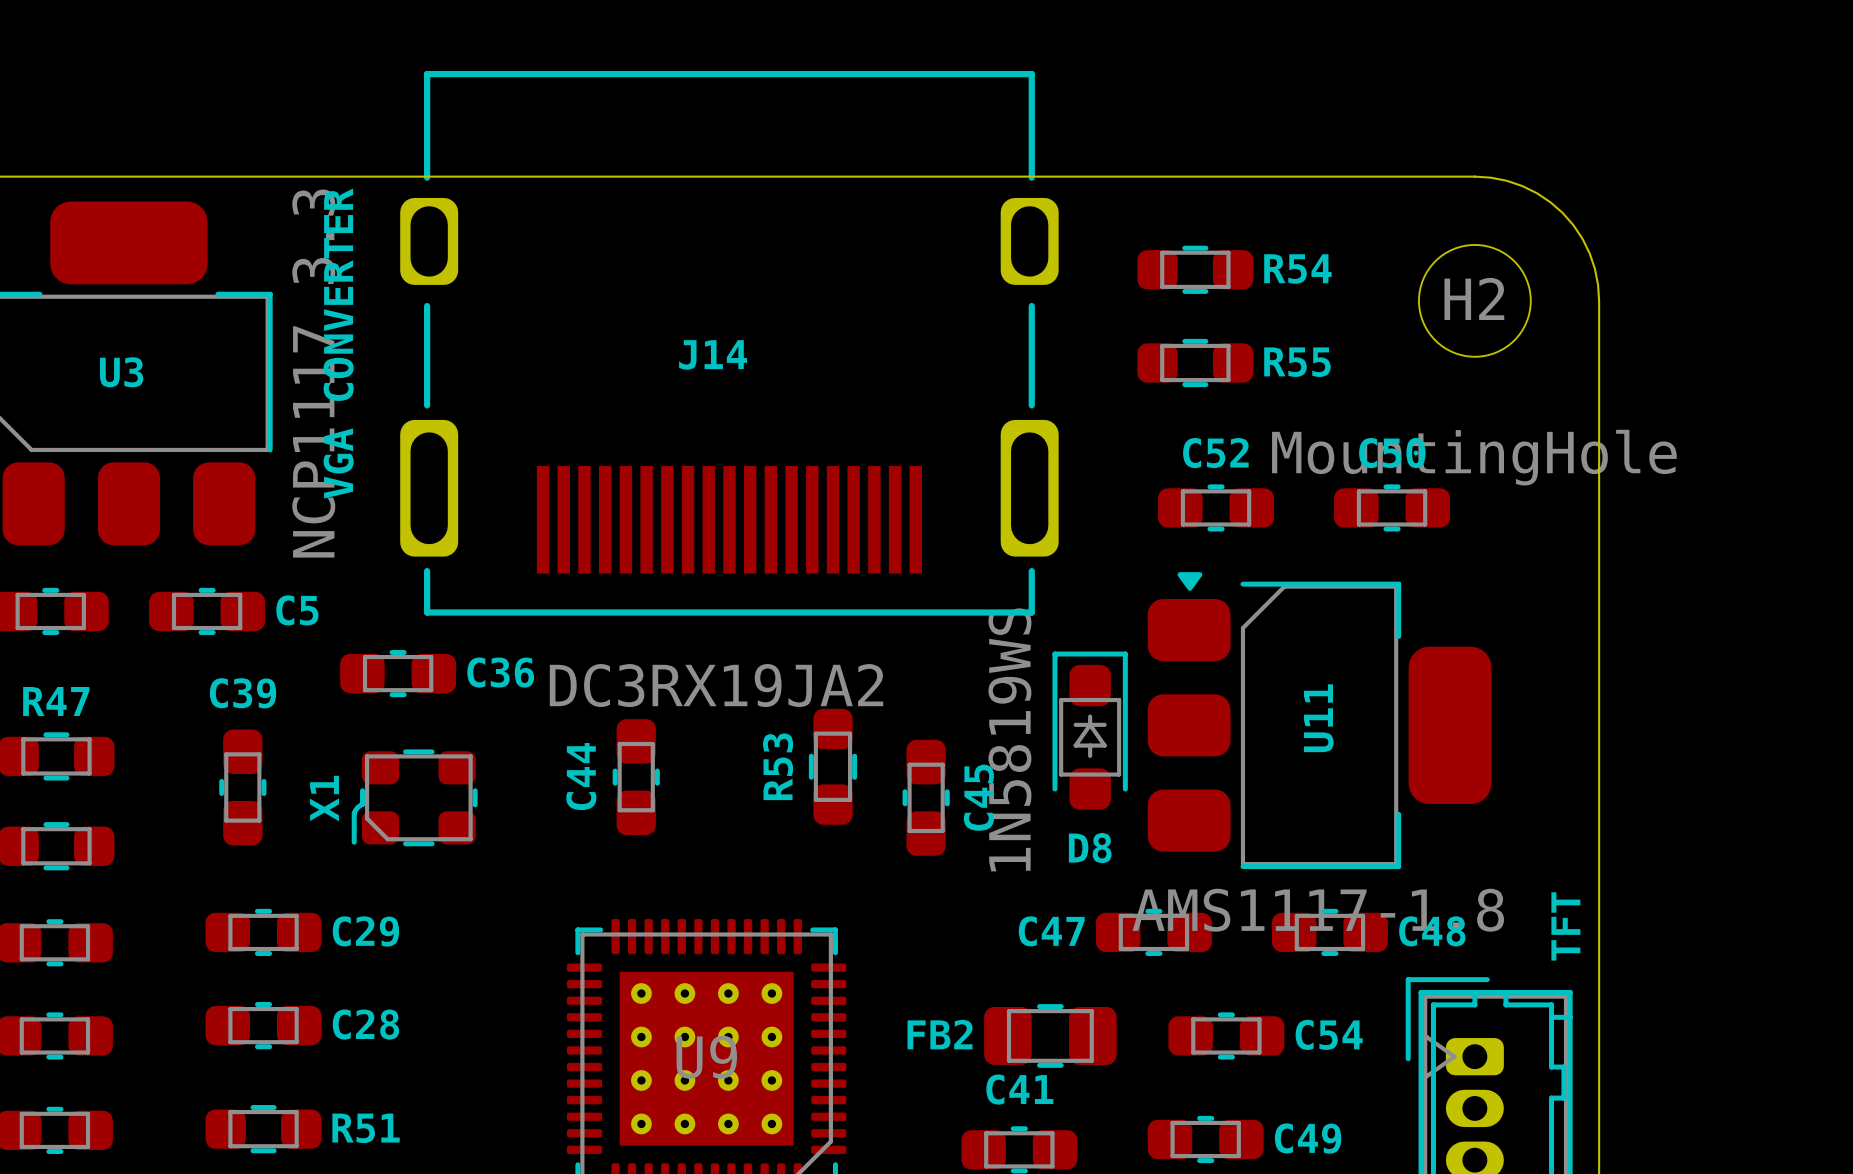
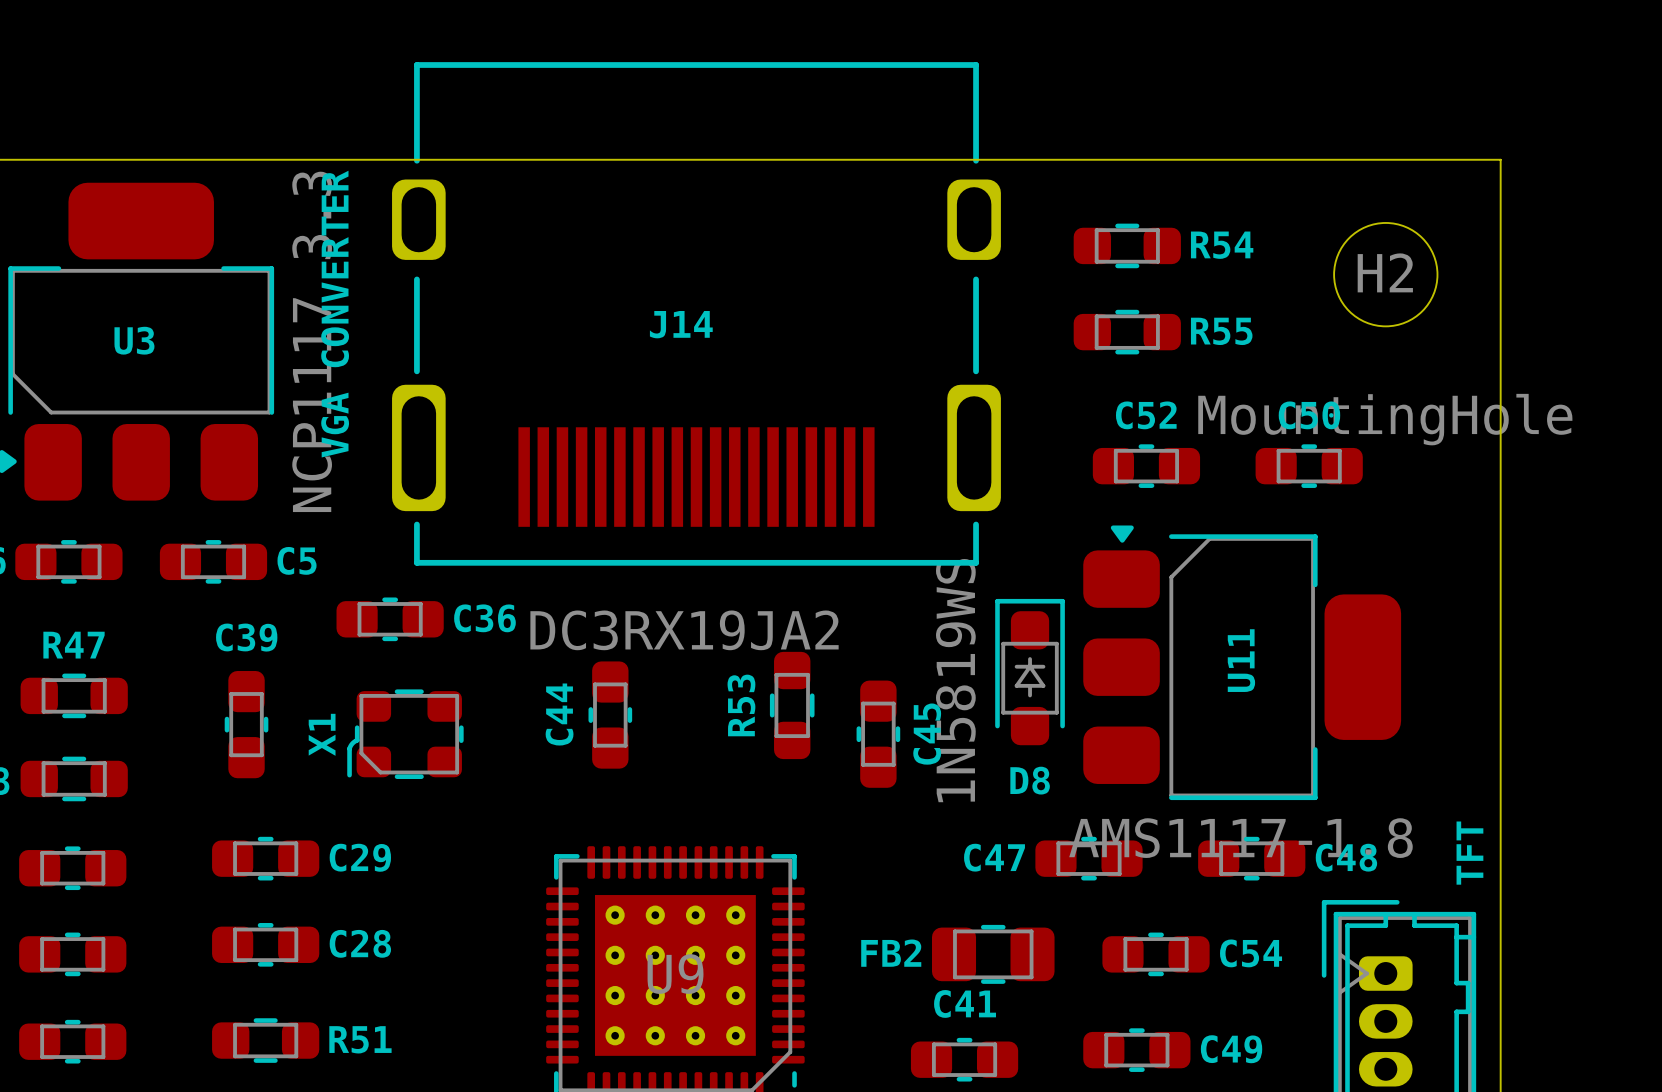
board edge: (1474, 176) (1491, 177) (1522, 186) (1550, 202) (1562, 213) (1573, 225) (1589, 253) (1598, 284) (1599, 300) -> (1385, 159) (1500, 159) (1500, 274)

